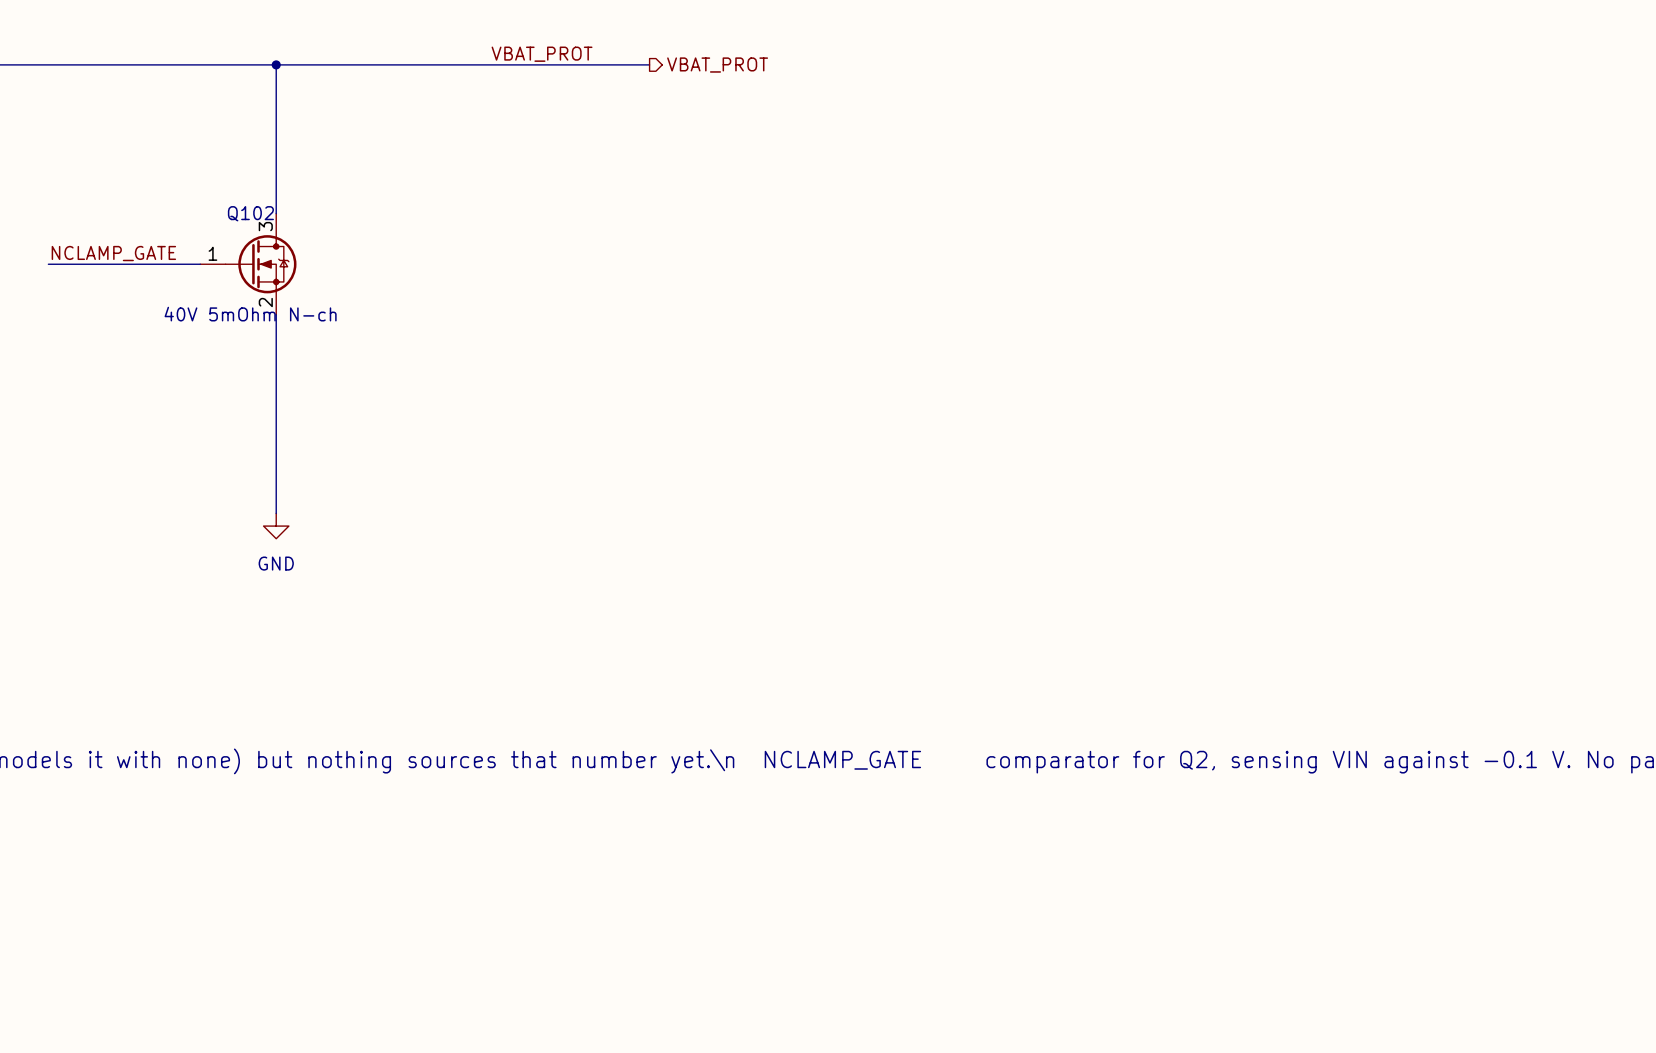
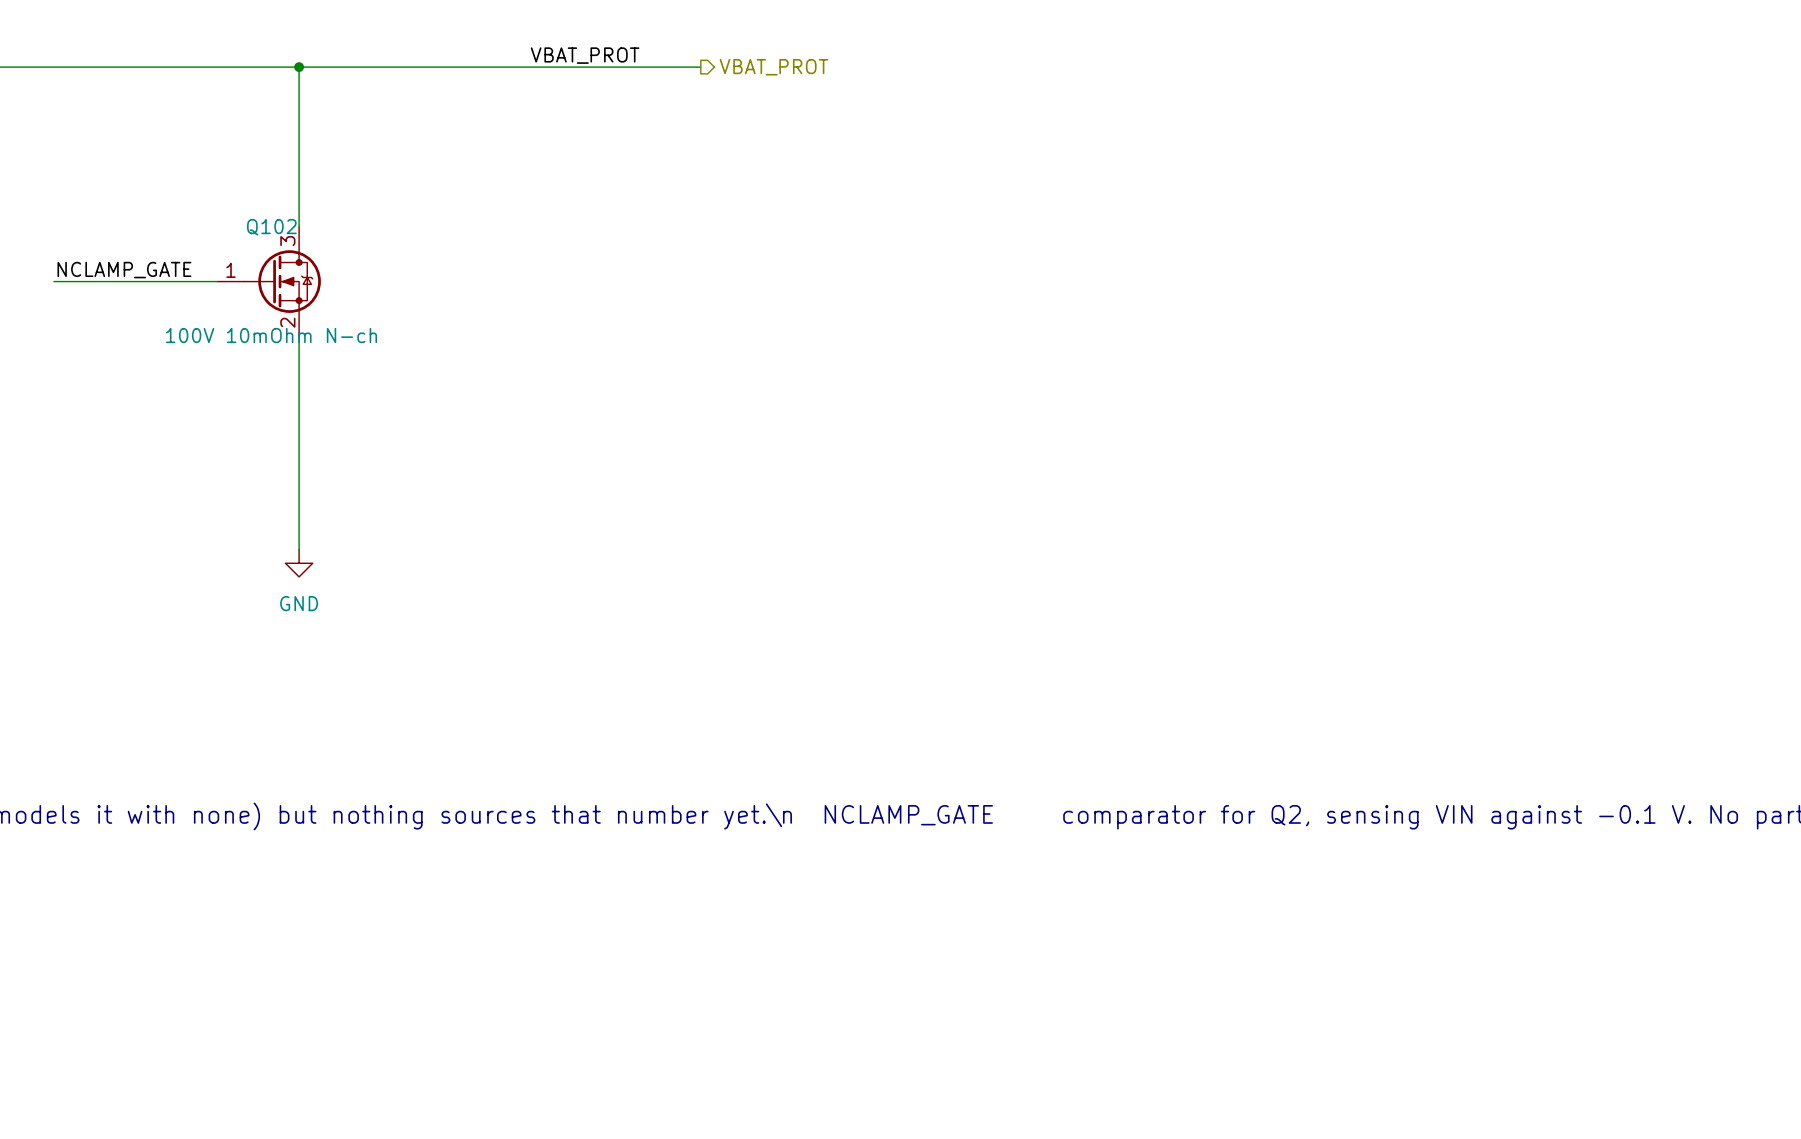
Q102 value: 40V 5mOhm N-ch (250, 314) -> 100V 10mOhm N-ch (271, 335)

